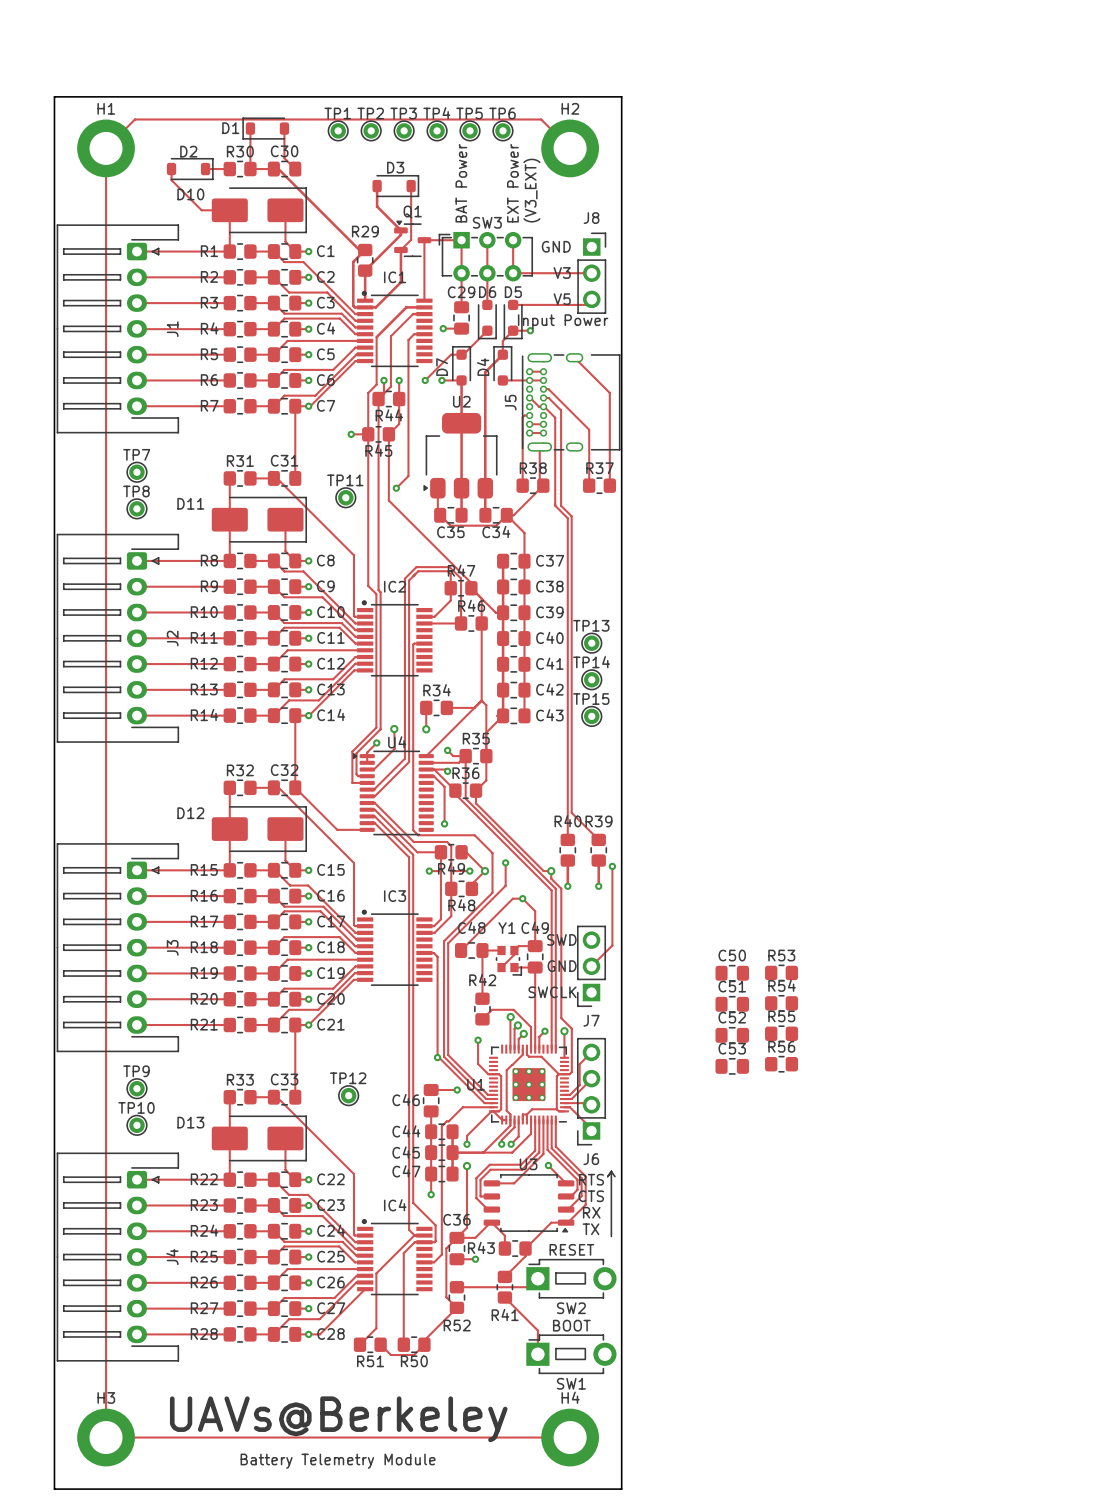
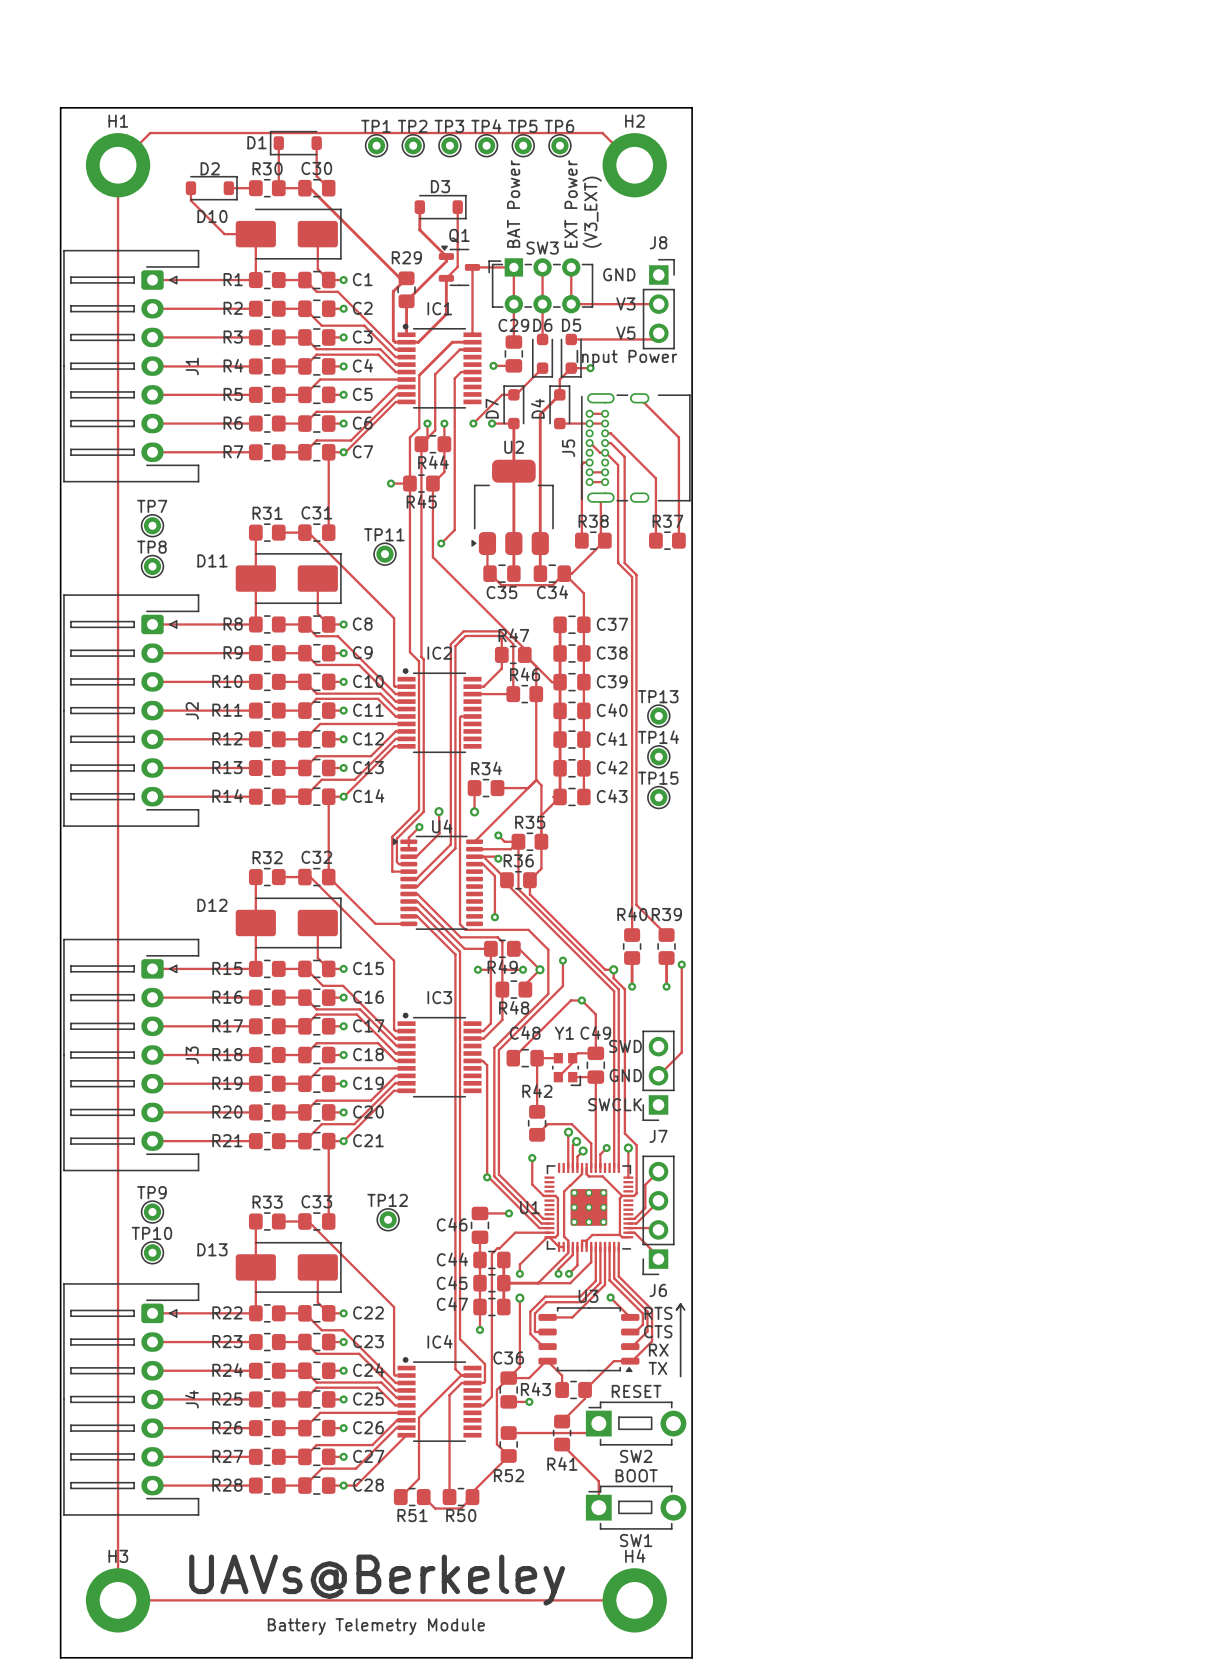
R53: (781, 972) -> none
C50: (732, 973) -> none
R54: (781, 1003) -> none
C51: (732, 1004) -> none
R55: (781, 1033) -> none
C52: (732, 1035) -> none
R56: (781, 1064) -> none
C53: (732, 1066) -> none

